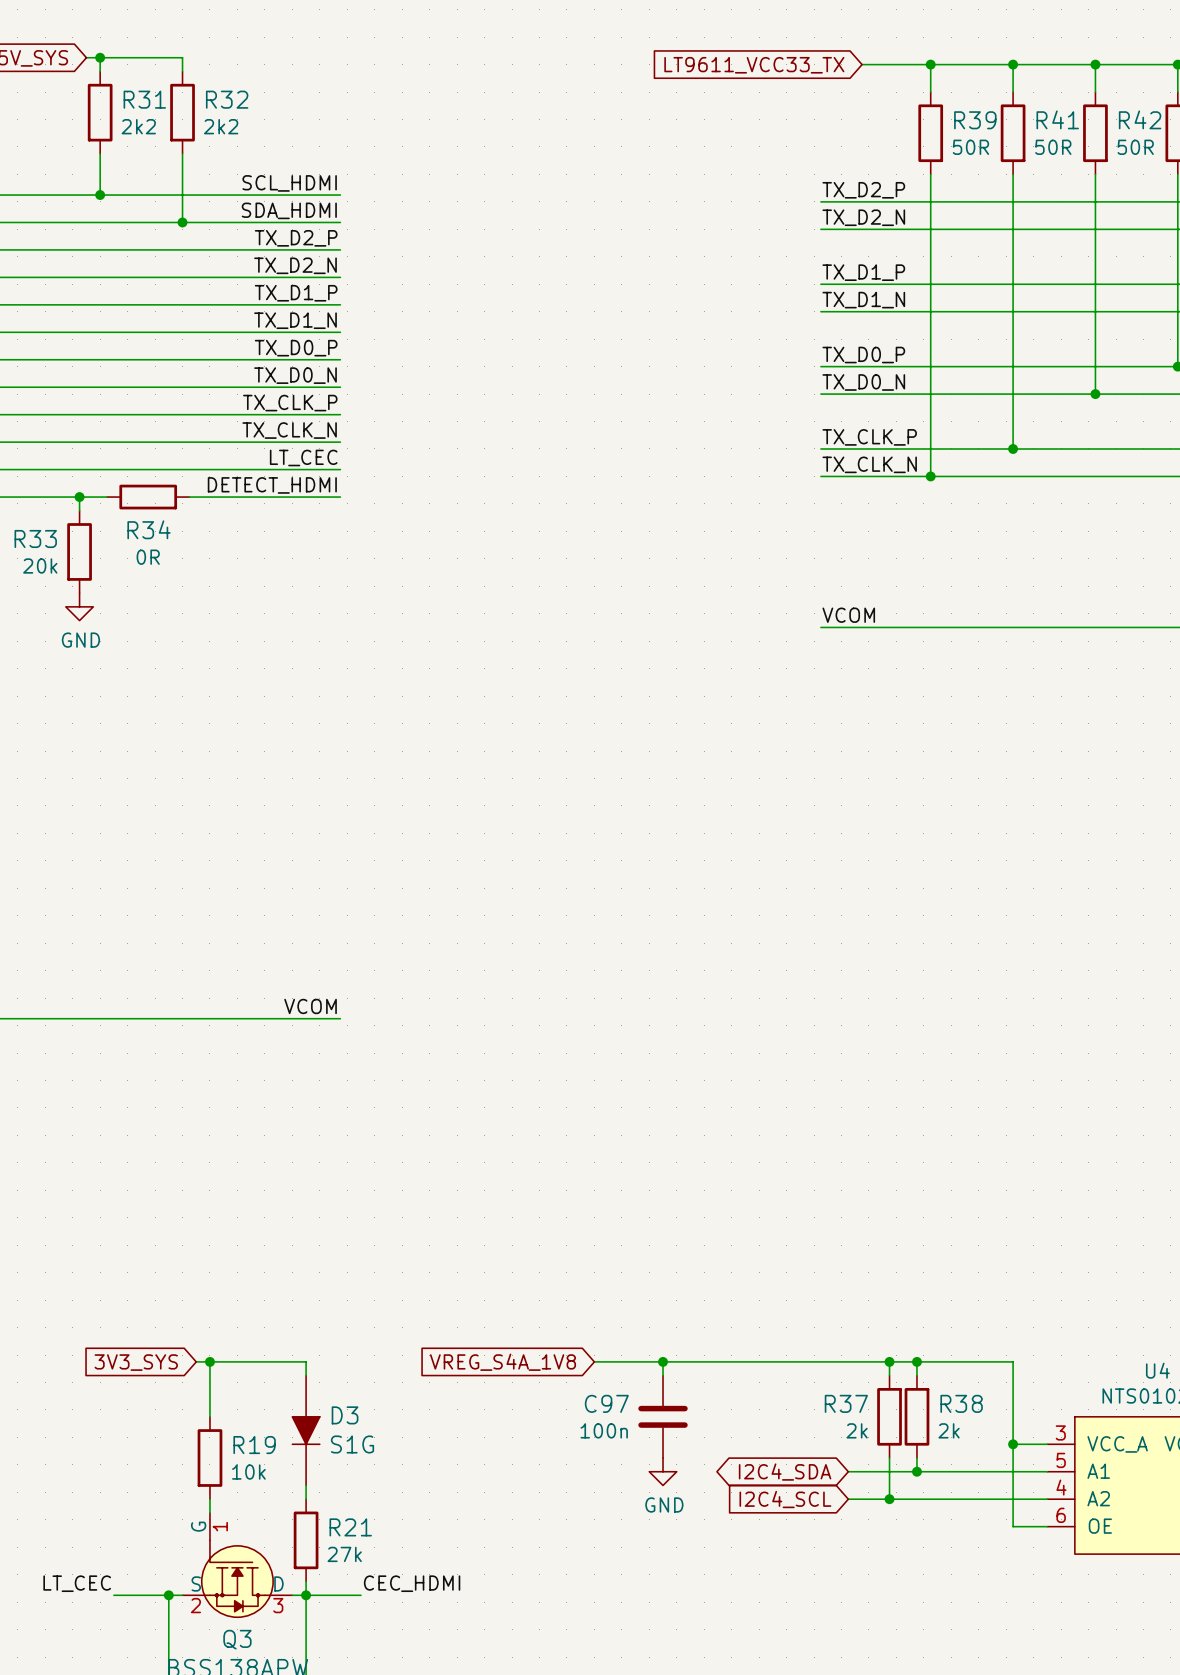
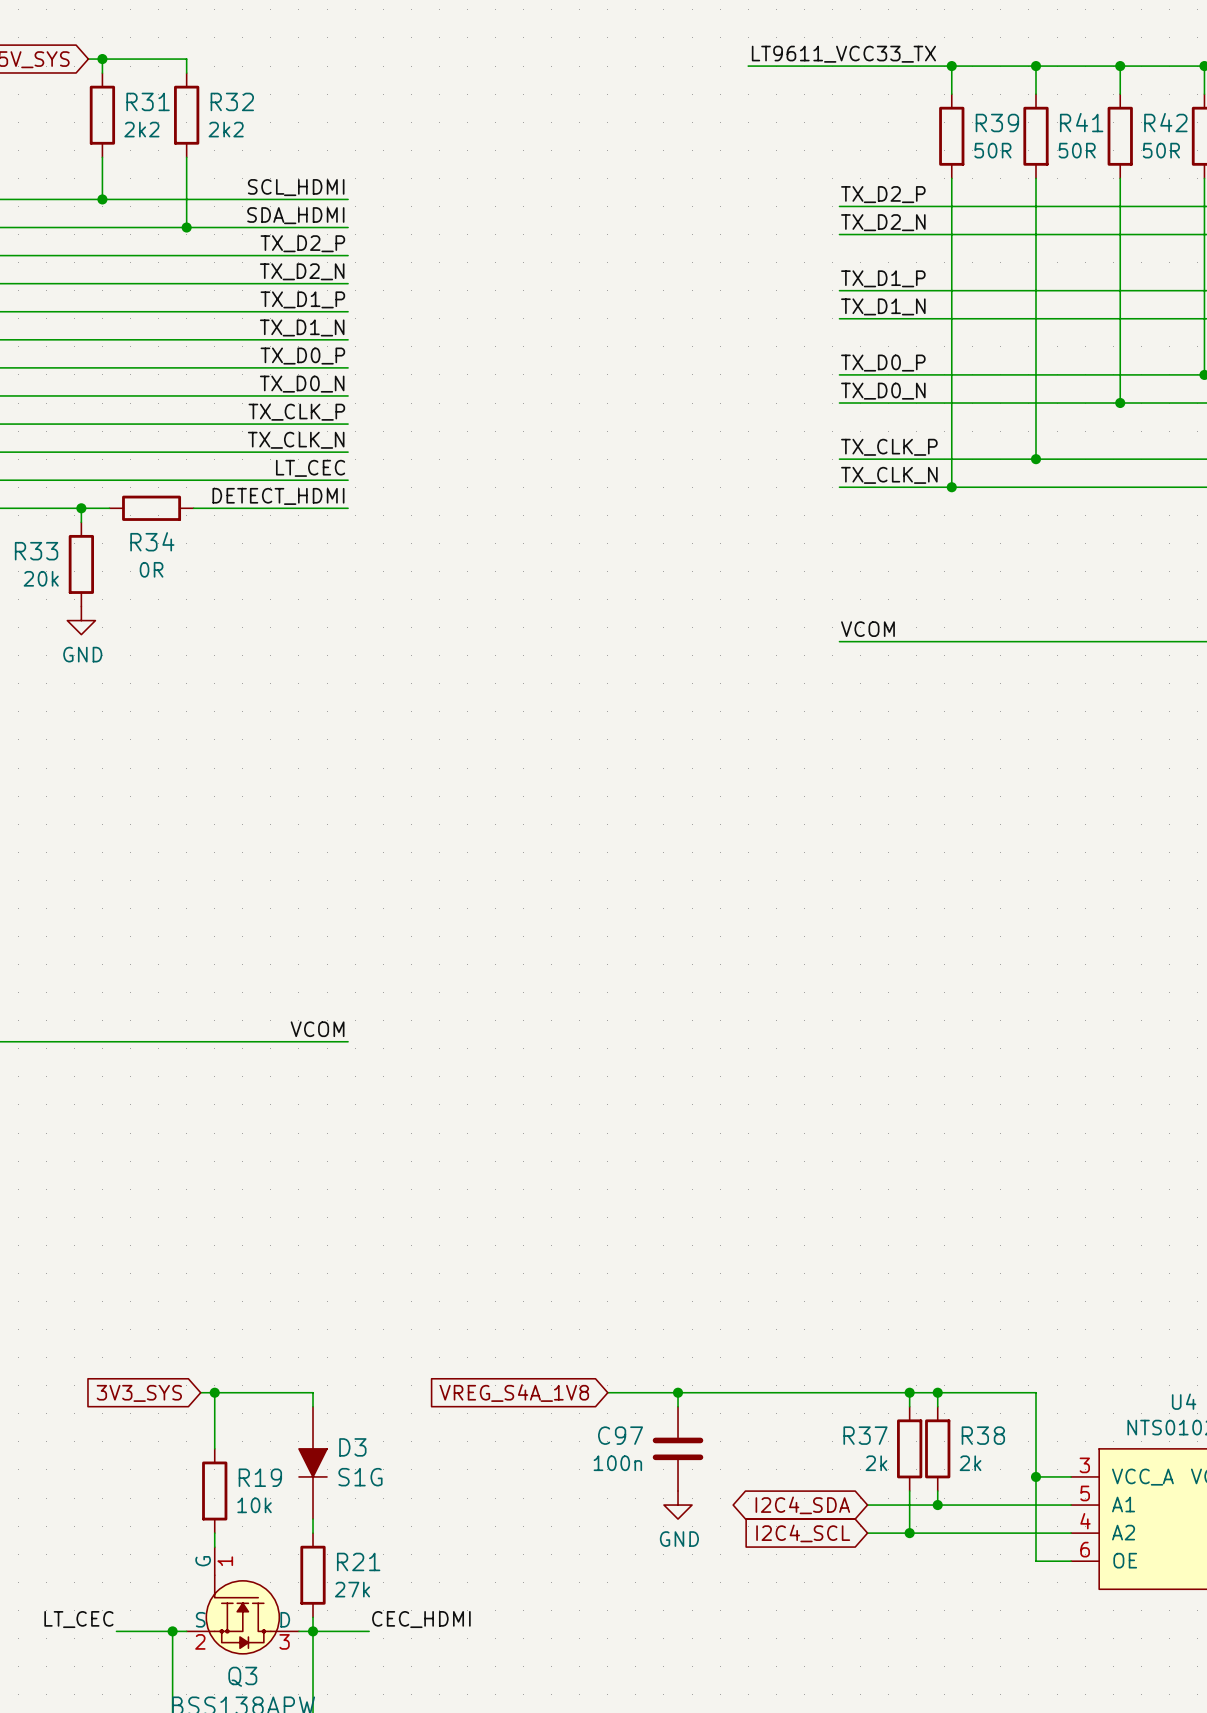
label: none -> LT9611_VCC33_TX (843, 54)
wire: none -> (748, 66) (881, 66)
global label: LT9611_VCC33_TX (754, 65) -> none

